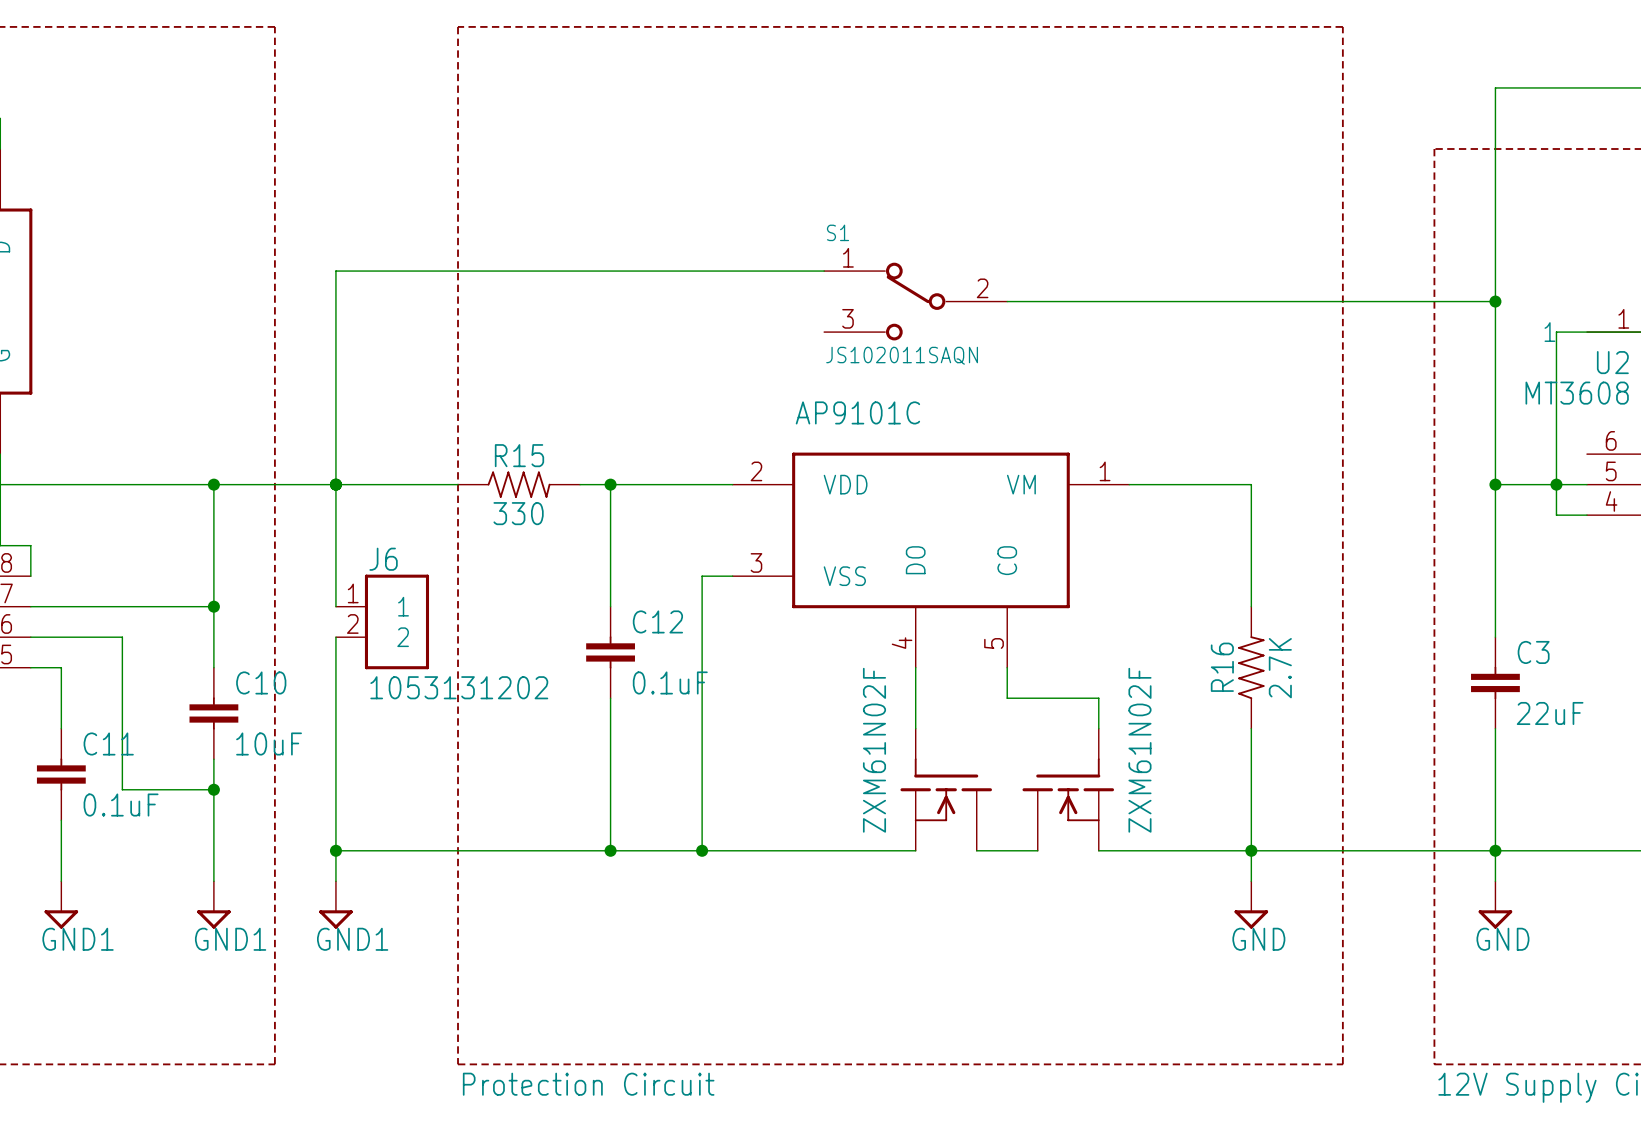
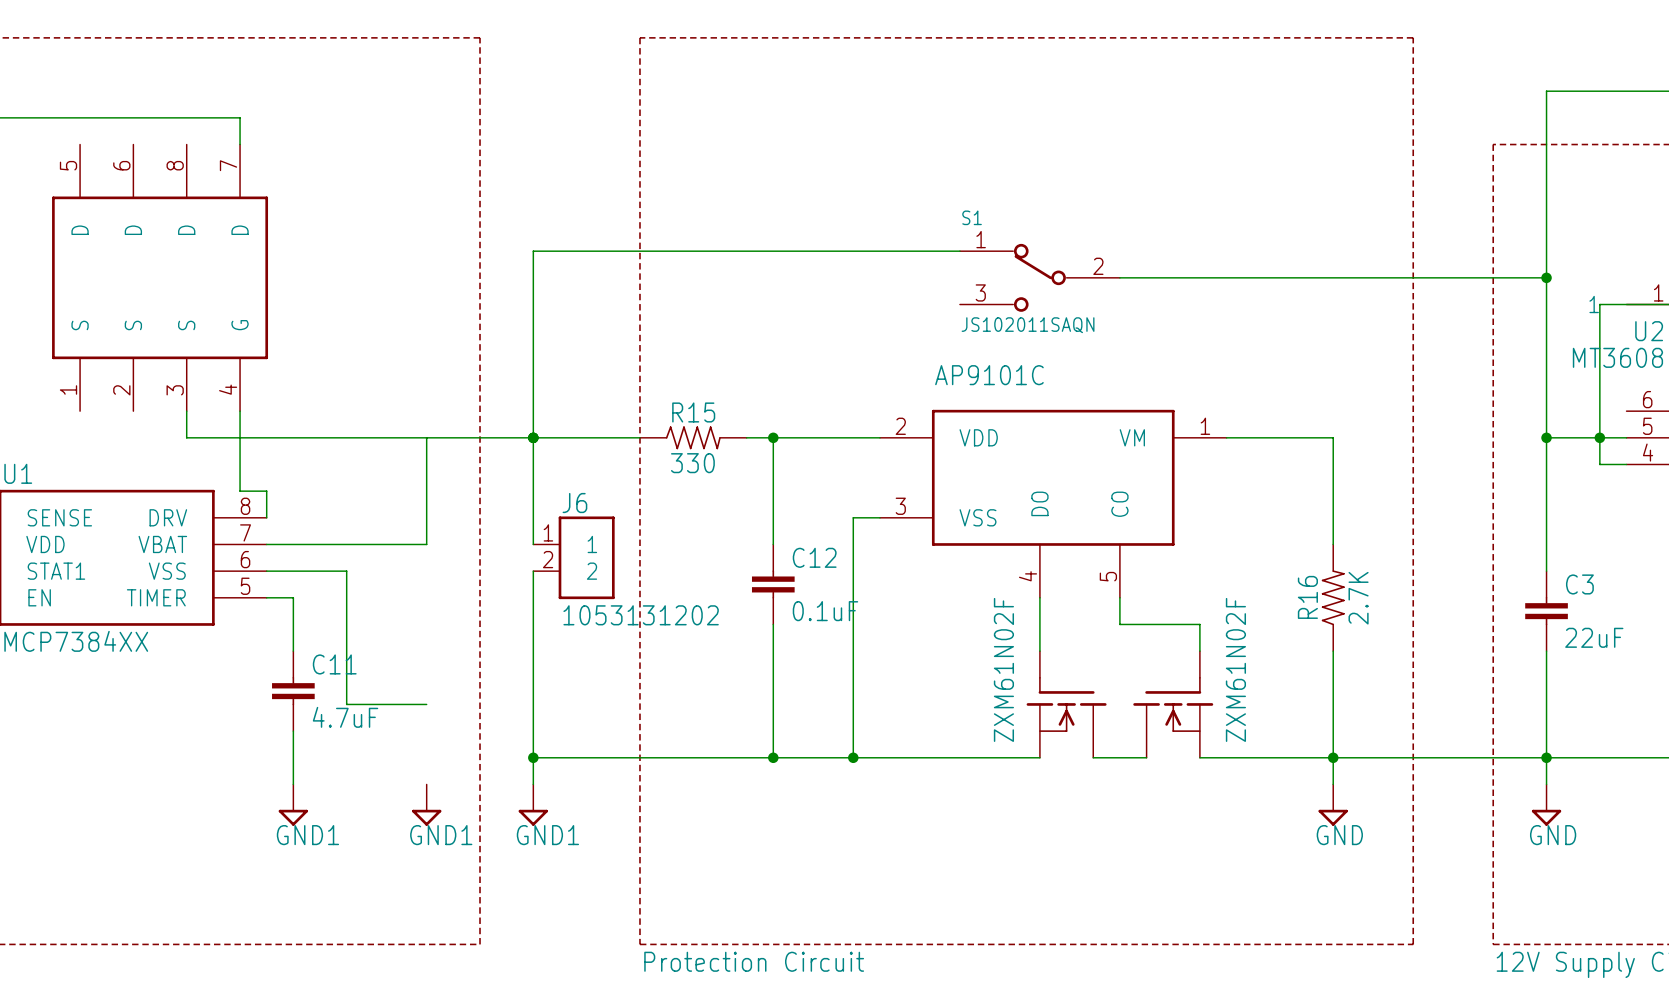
junction: (213, 484) -> none
wire: (213, 606) (213, 667) -> none
junction: (213, 606) -> none
C10: 10uF (213, 713) -> none
wire: (213, 759) (213, 881) -> none
junction: (213, 789) -> none
C11 value: 0.1uF (121, 805) -> 4.7uF (345, 717)

